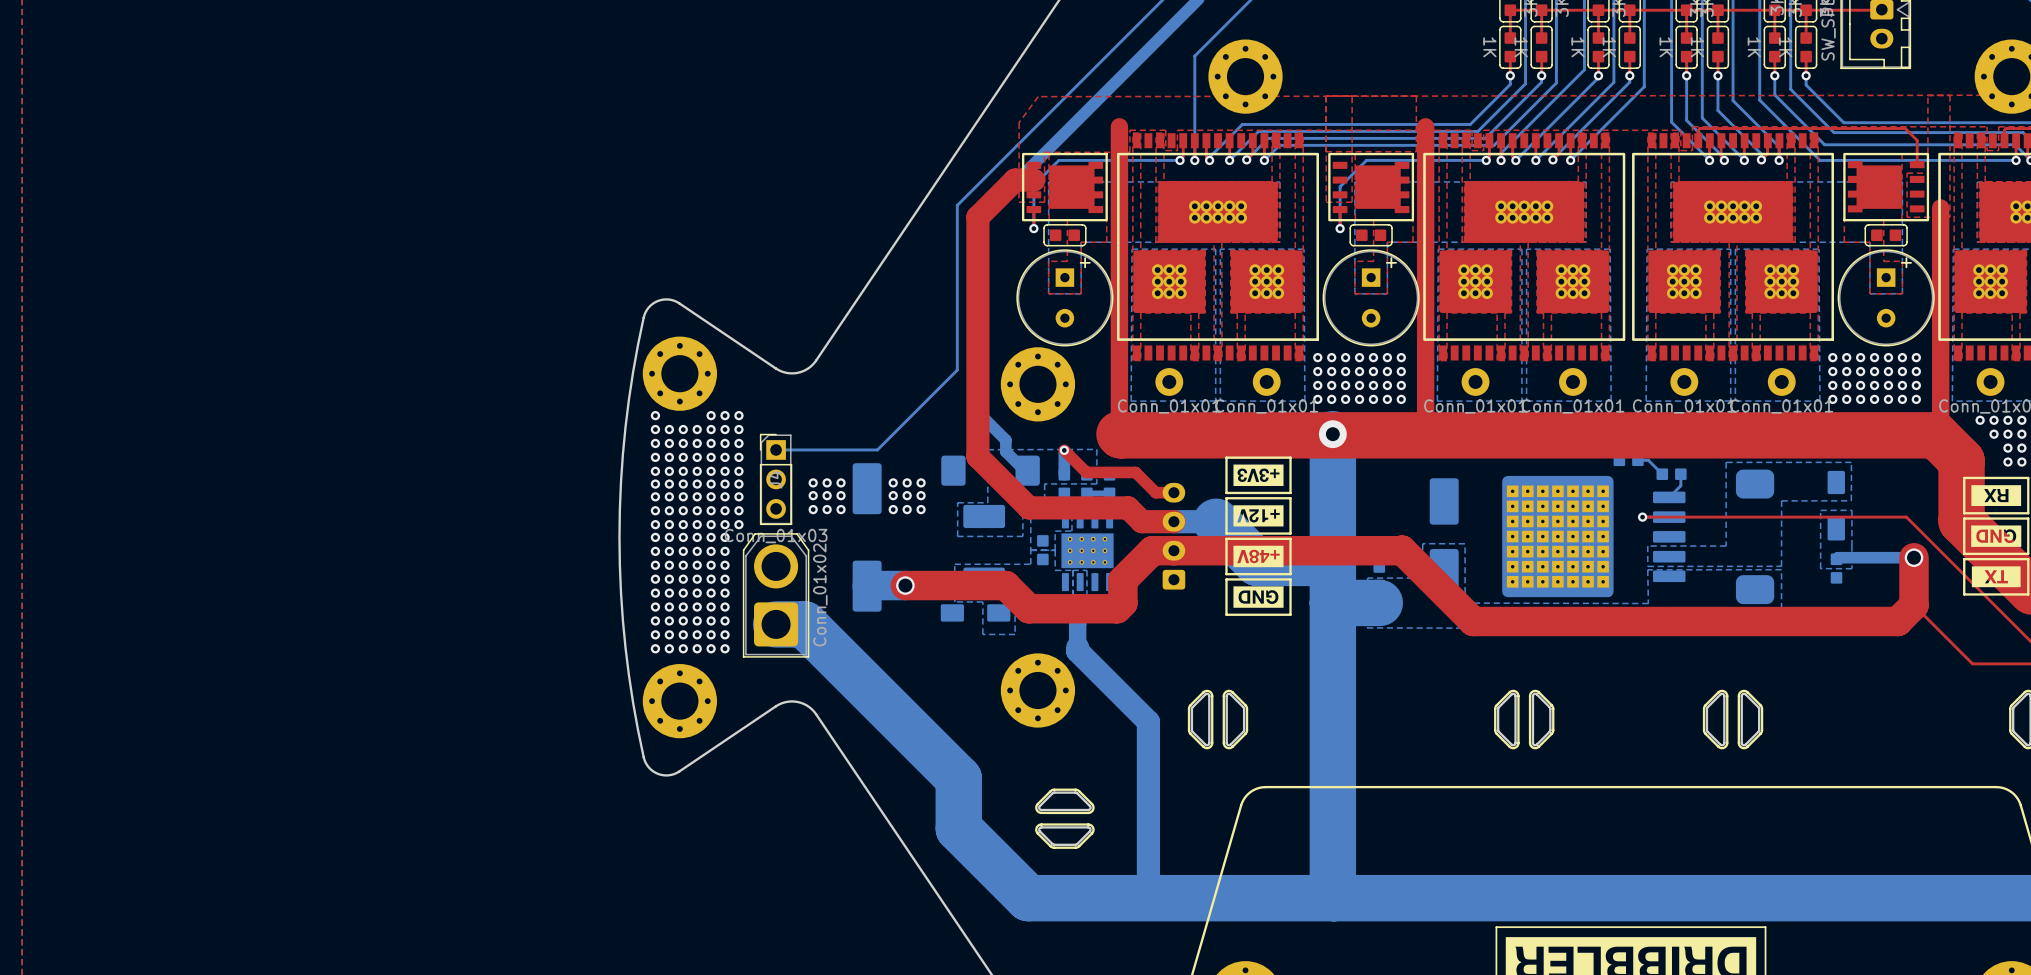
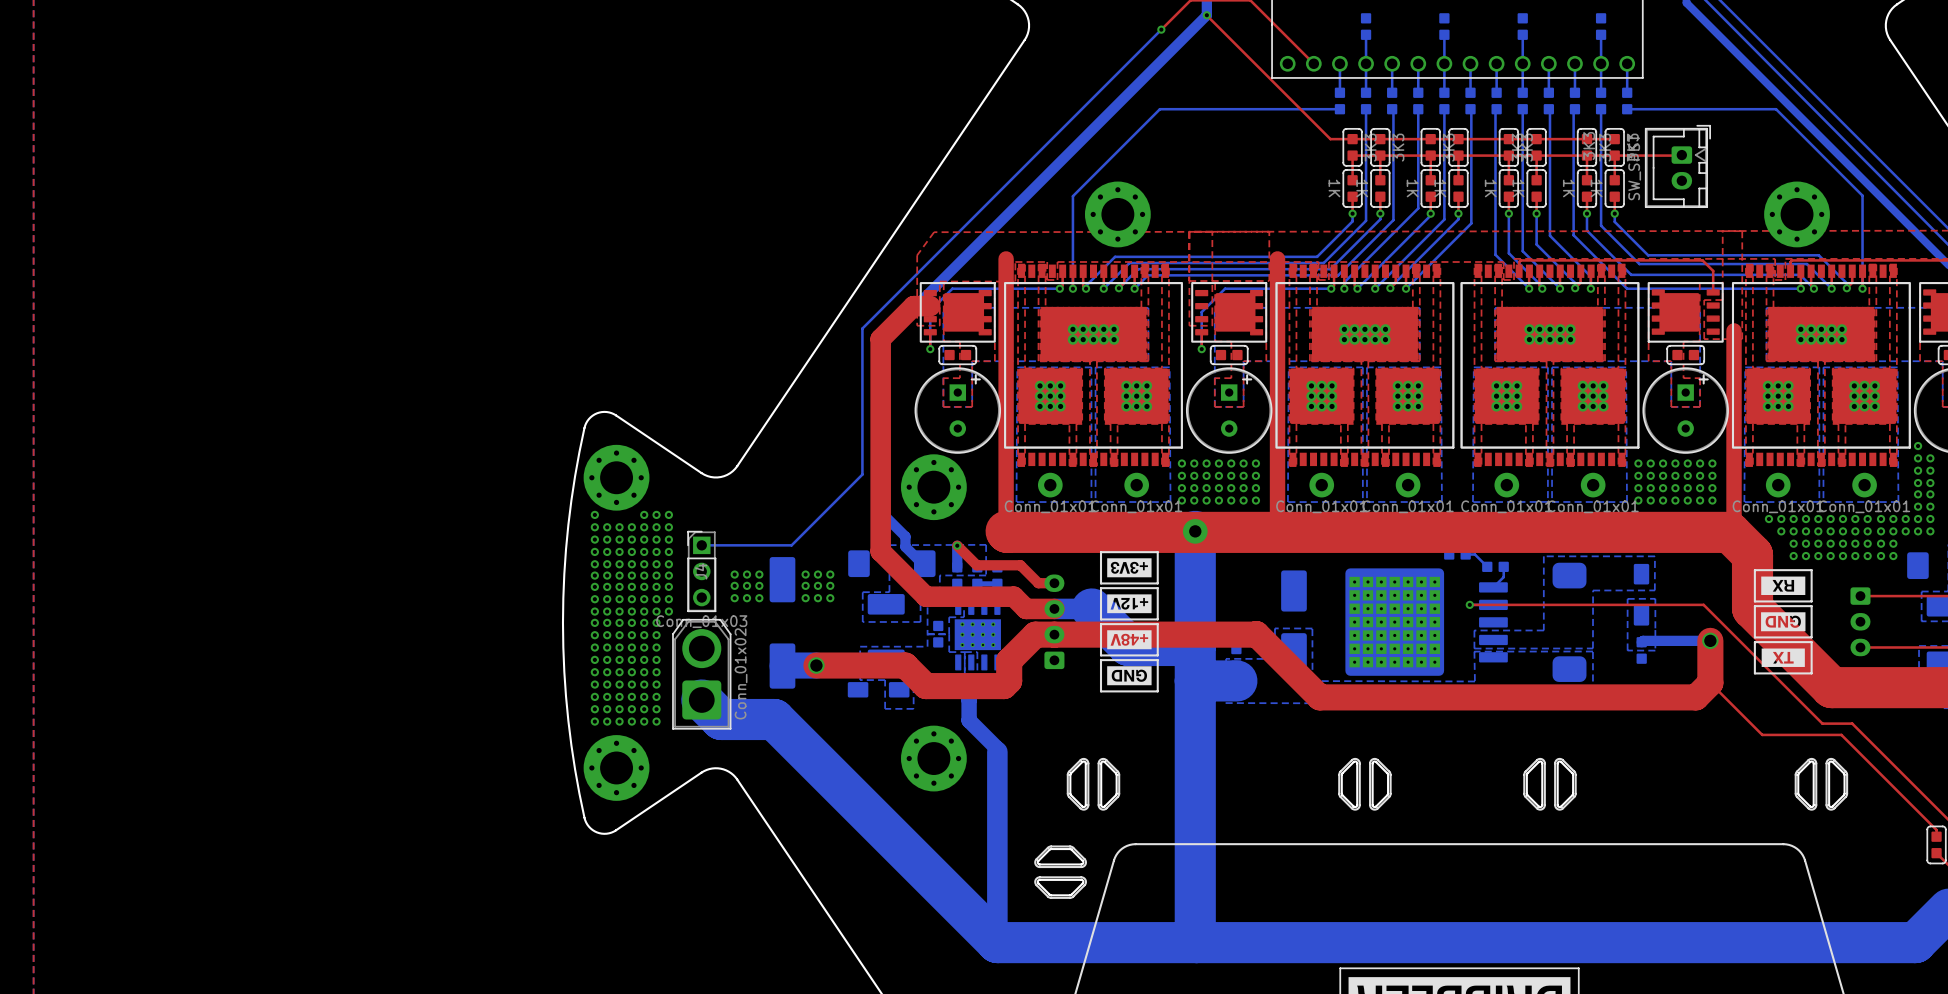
bottom track: (776, 624) (804, 624) (958, 778) (958, 828) (1028, 898) (1109, 898) -> (701, 699) (721, 719) (774, 719) (997, 942) (997, 748) (969, 720)
bottom track: (1077, 647) (1077, 651) (1148, 721) (1148, 898) -> none
drawing position: (1064, 818) -> (1060, 872)

